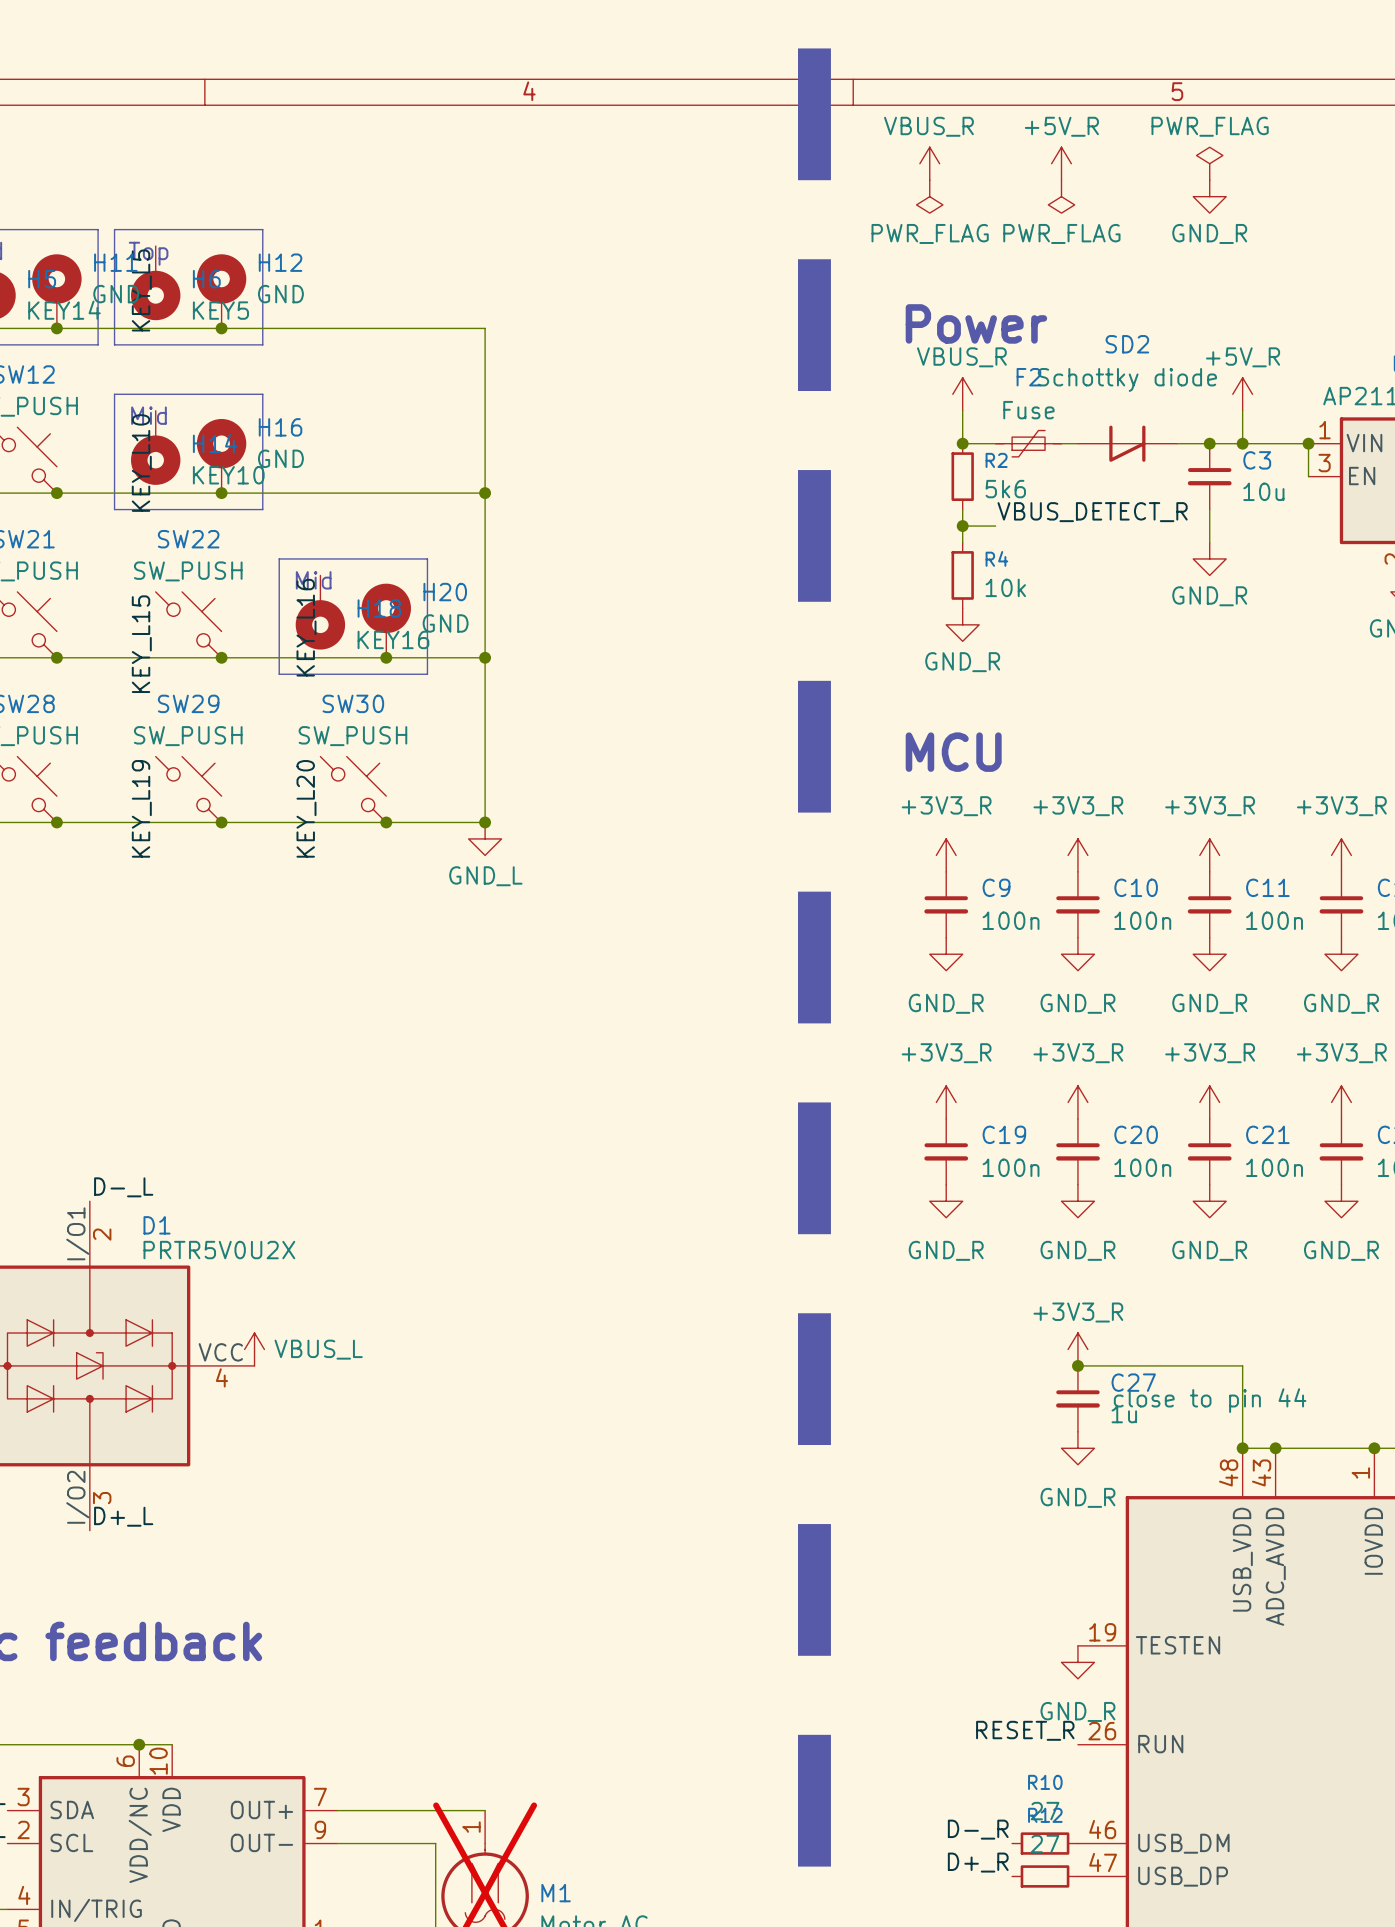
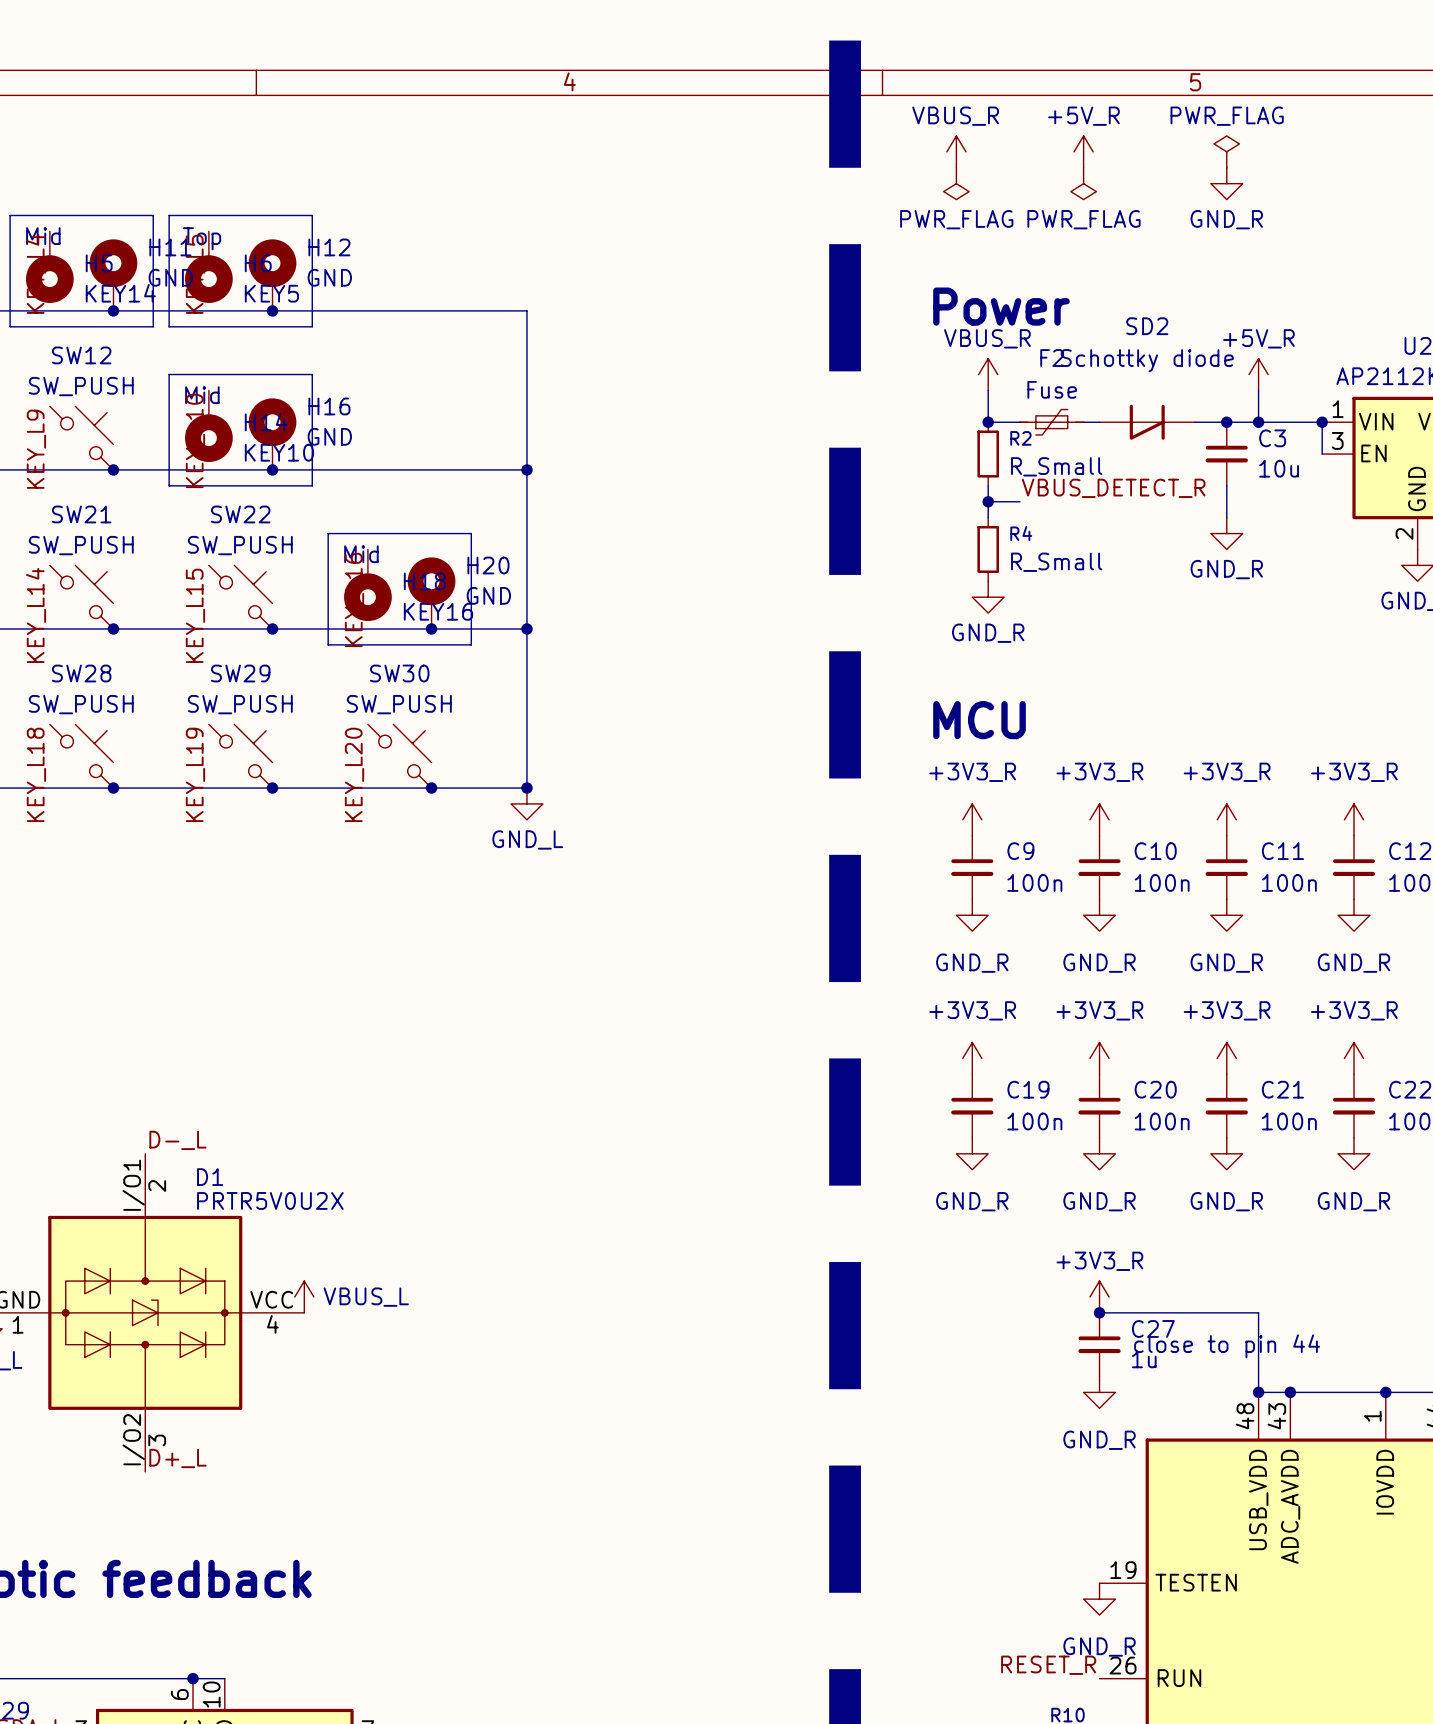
R2 value: 5k6 (1005, 489) -> R_Small (1056, 466)
R4 value: 10k (1005, 587) -> R_Small (1056, 562)

